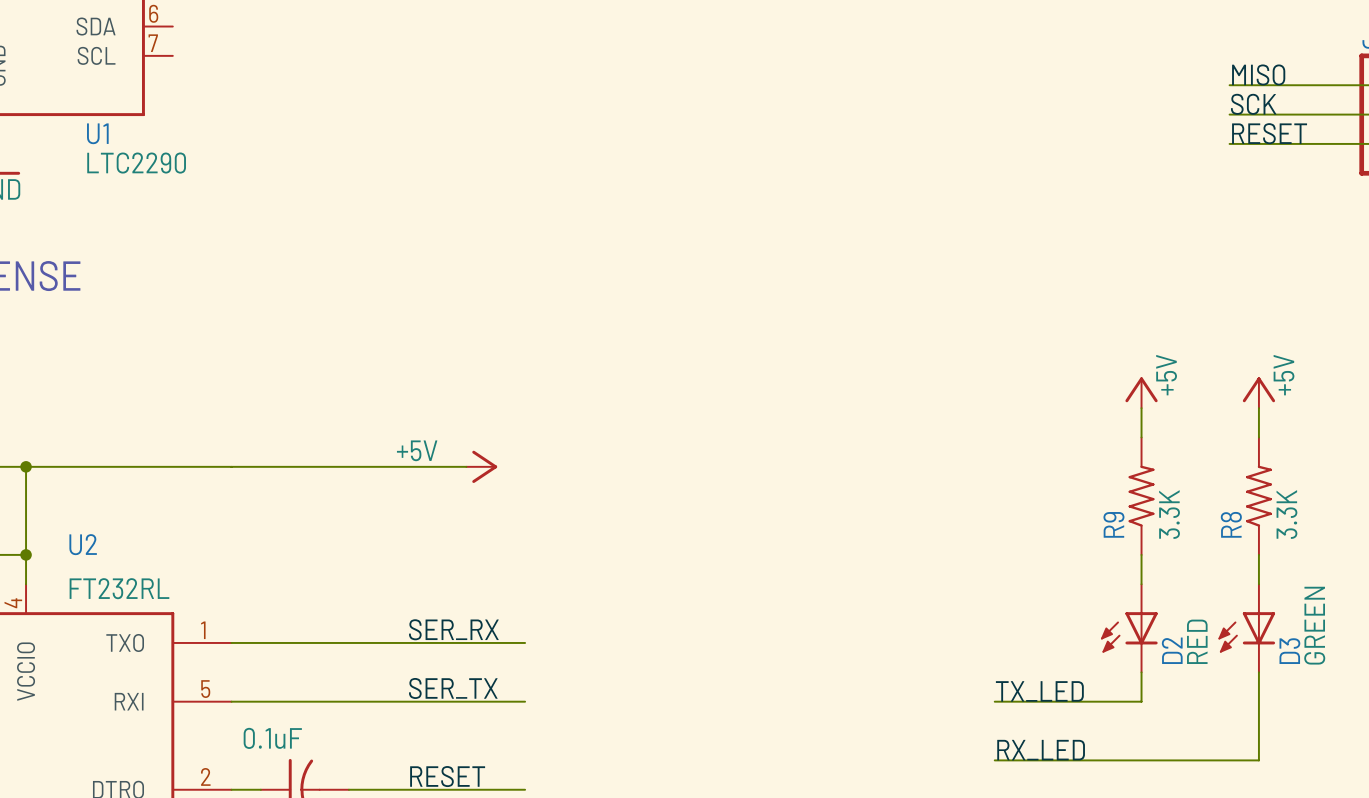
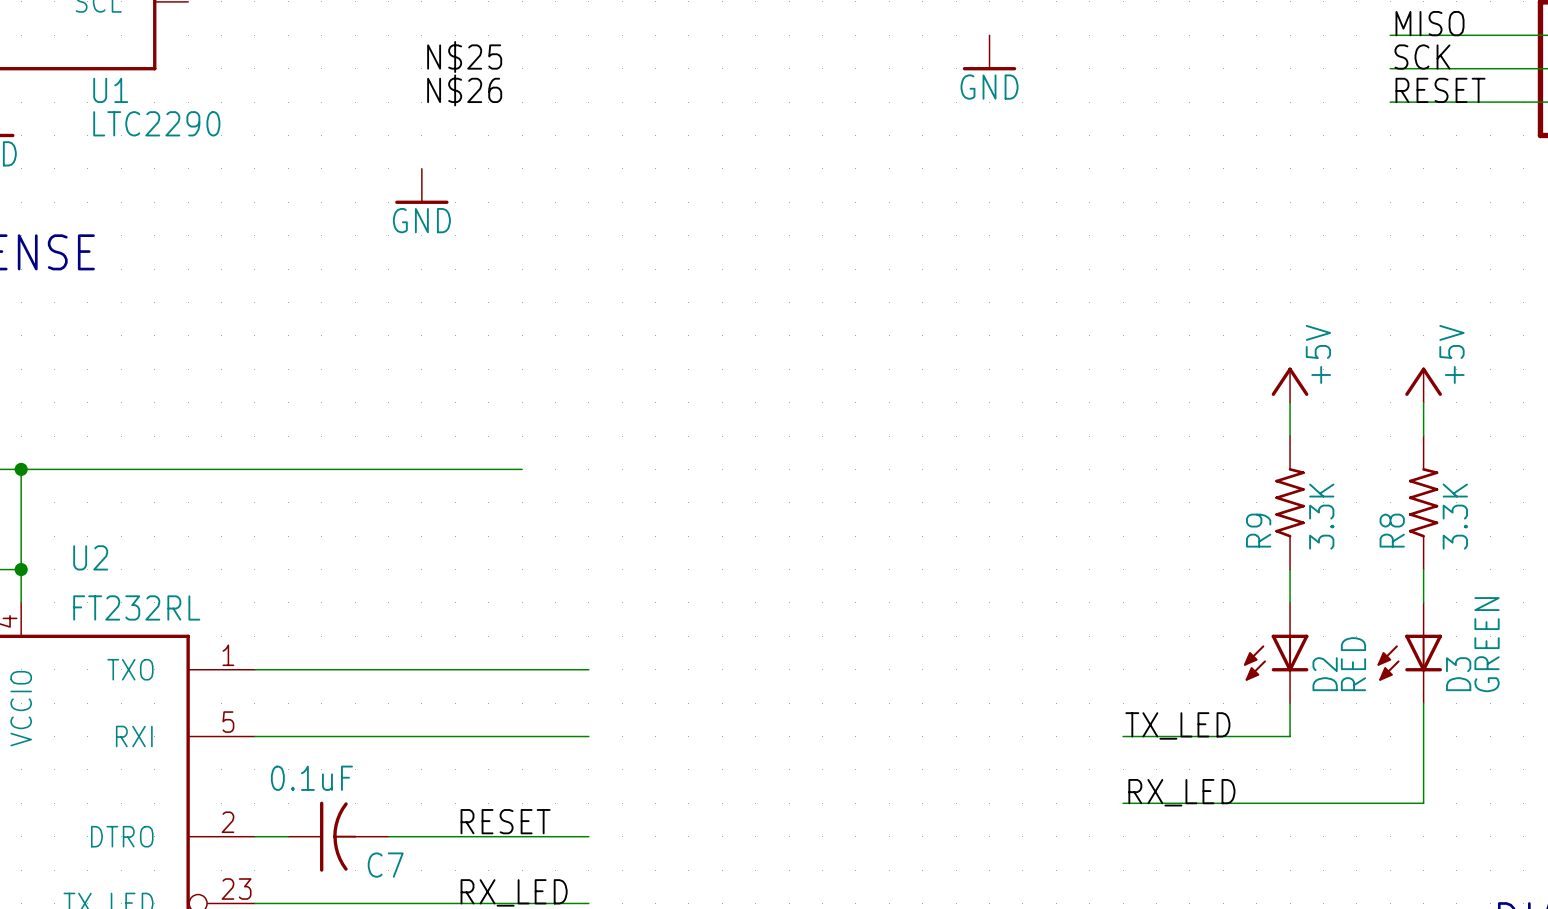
power symbol: none -> GND (989, 52)
label: none -> N$25 (464, 57)
label: none -> N$26 (464, 90)
power symbol: none -> GND (421, 186)
power symbol: +5V (481, 466) -> none
label: SER_RX (453, 629) -> none
label: SER_TX (453, 688) -> none

